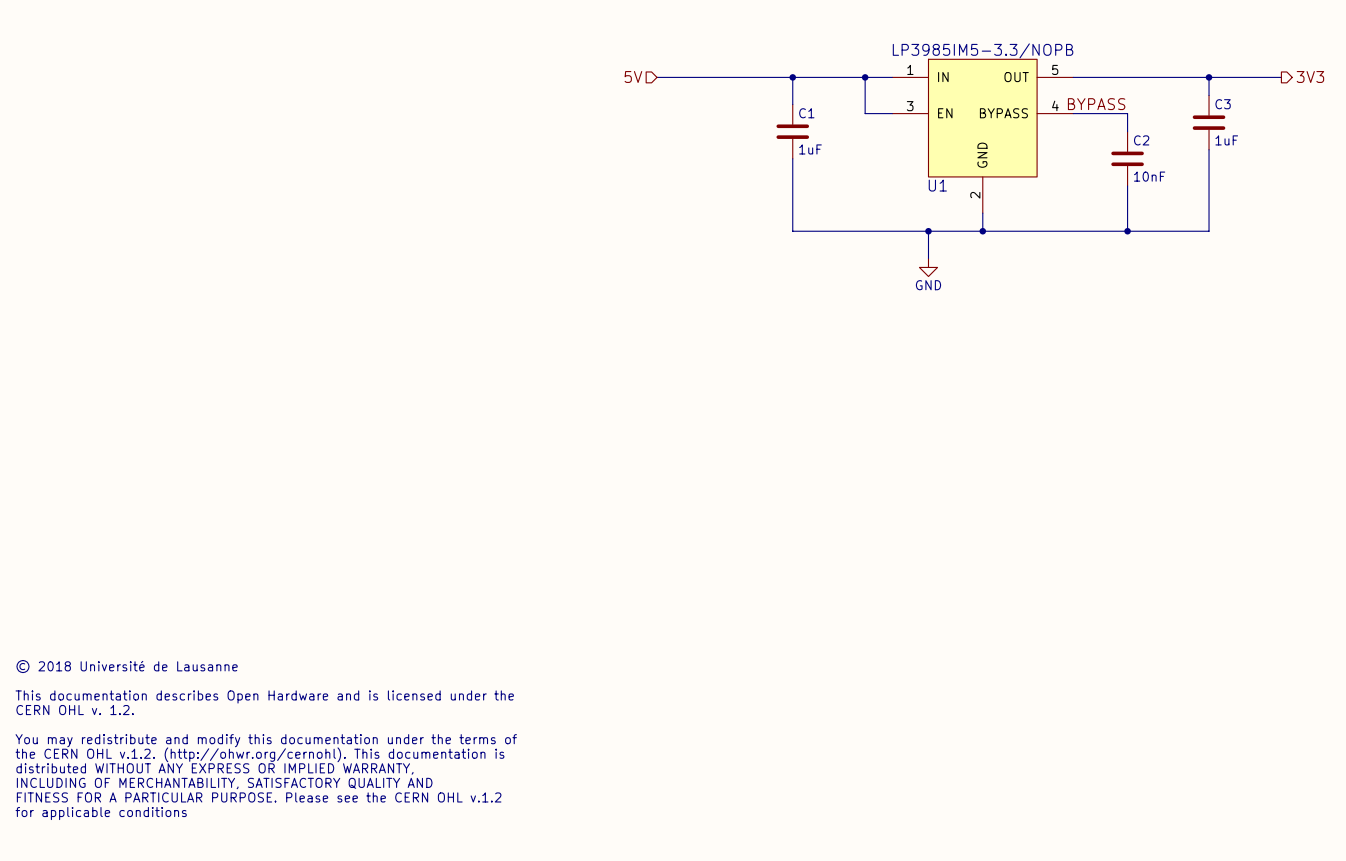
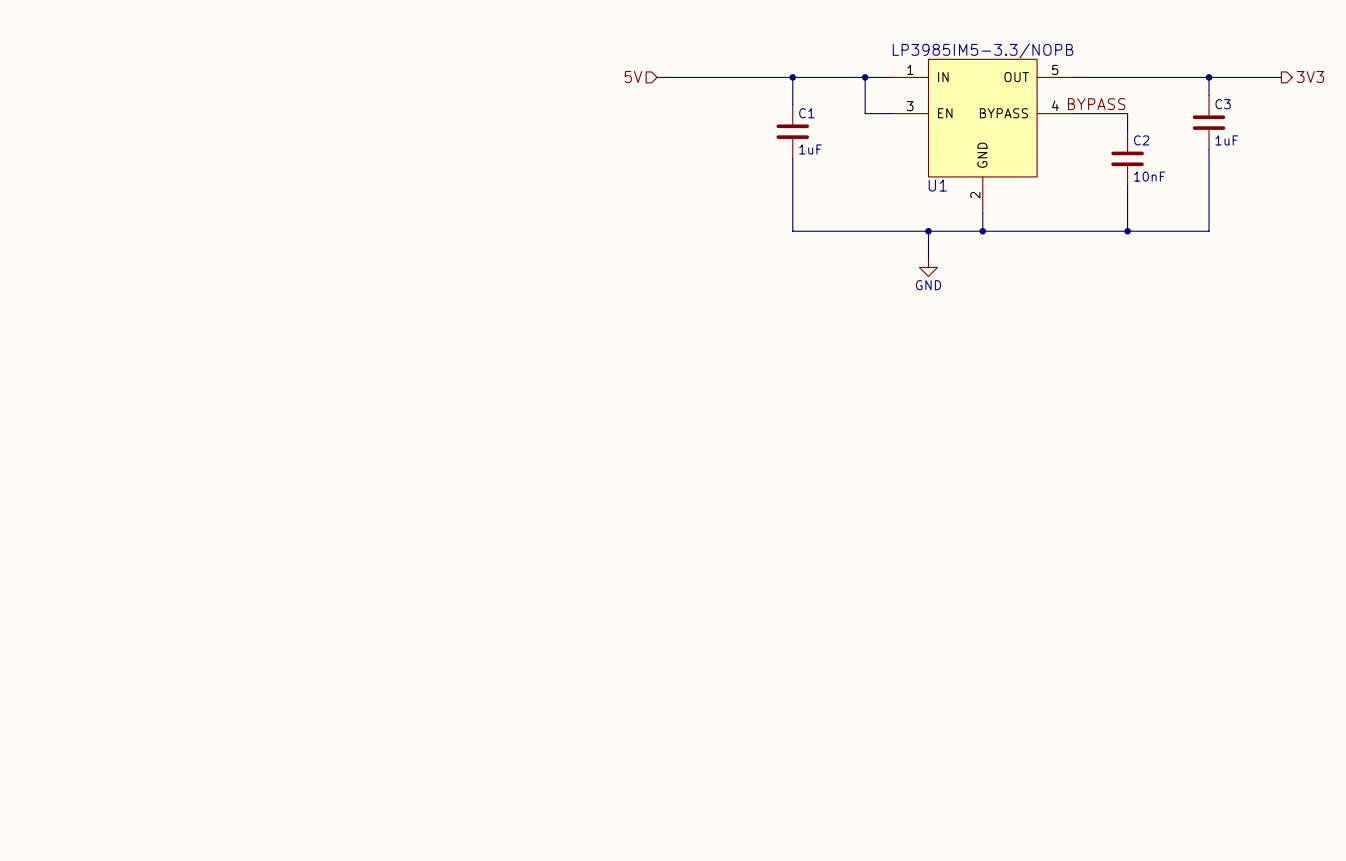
text: © 2018 Université de Lausanne (127, 666) -> none
text: This documentation describes Open Hardware and is licensed under the (264, 696) -> none
text: CERN OHL v. 1.2. (75, 710) -> none
text: You may redistribute and modify this documentation under the terms of (266, 740) -> none
text: the CERN OHL v.1.2. (http://ohwr.org/cernohl). This documentation is (259, 754) -> none
text: distributed WITHOUT ANY EXPRESS OR IMPLIED WARRANTY, (214, 768) -> none
text: INCLUDING OF MERCHANTABILITY, SATISFACTORY QUALITY AND (224, 783) -> none
text: FITNESS FOR A PARTICULAR PURPOSE. Please see the CERN OHL v.1.2 (259, 797) -> none
text: for applicable conditions (101, 813) -> none

